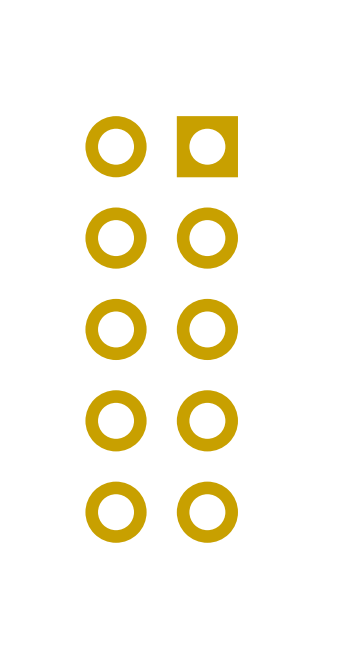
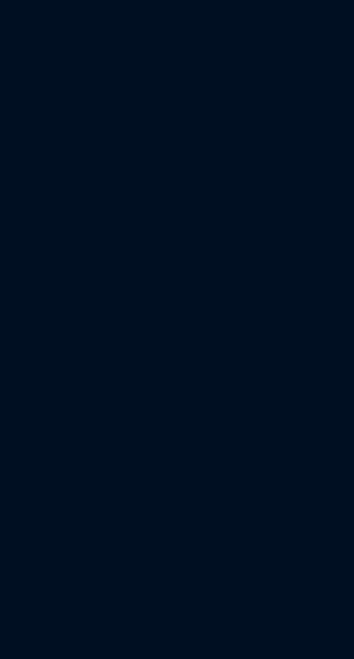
part: (161, 329) -> none

